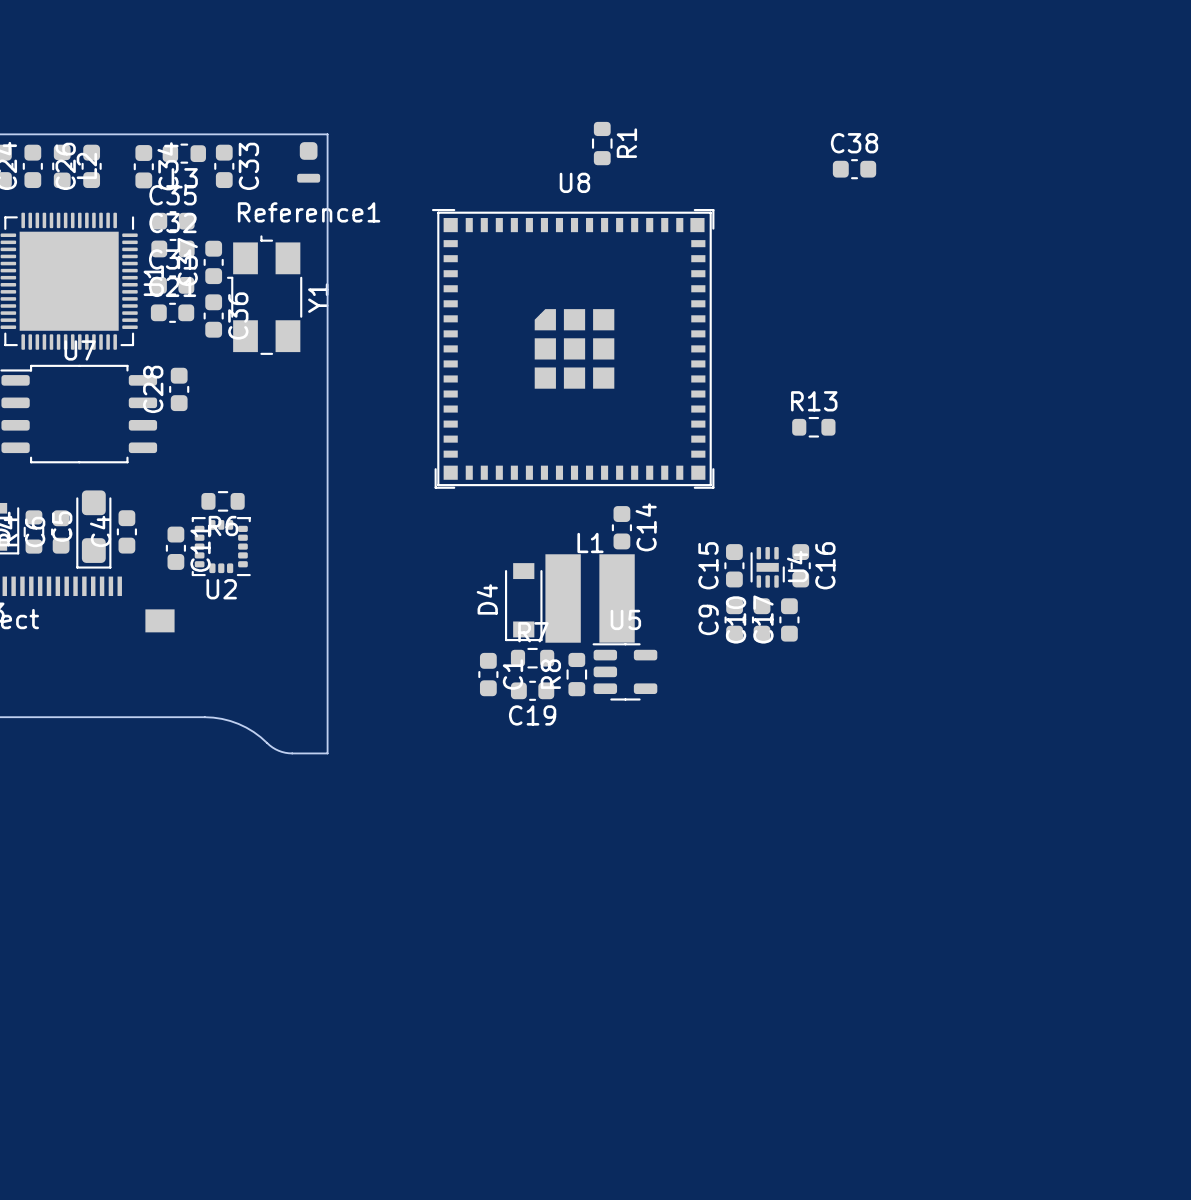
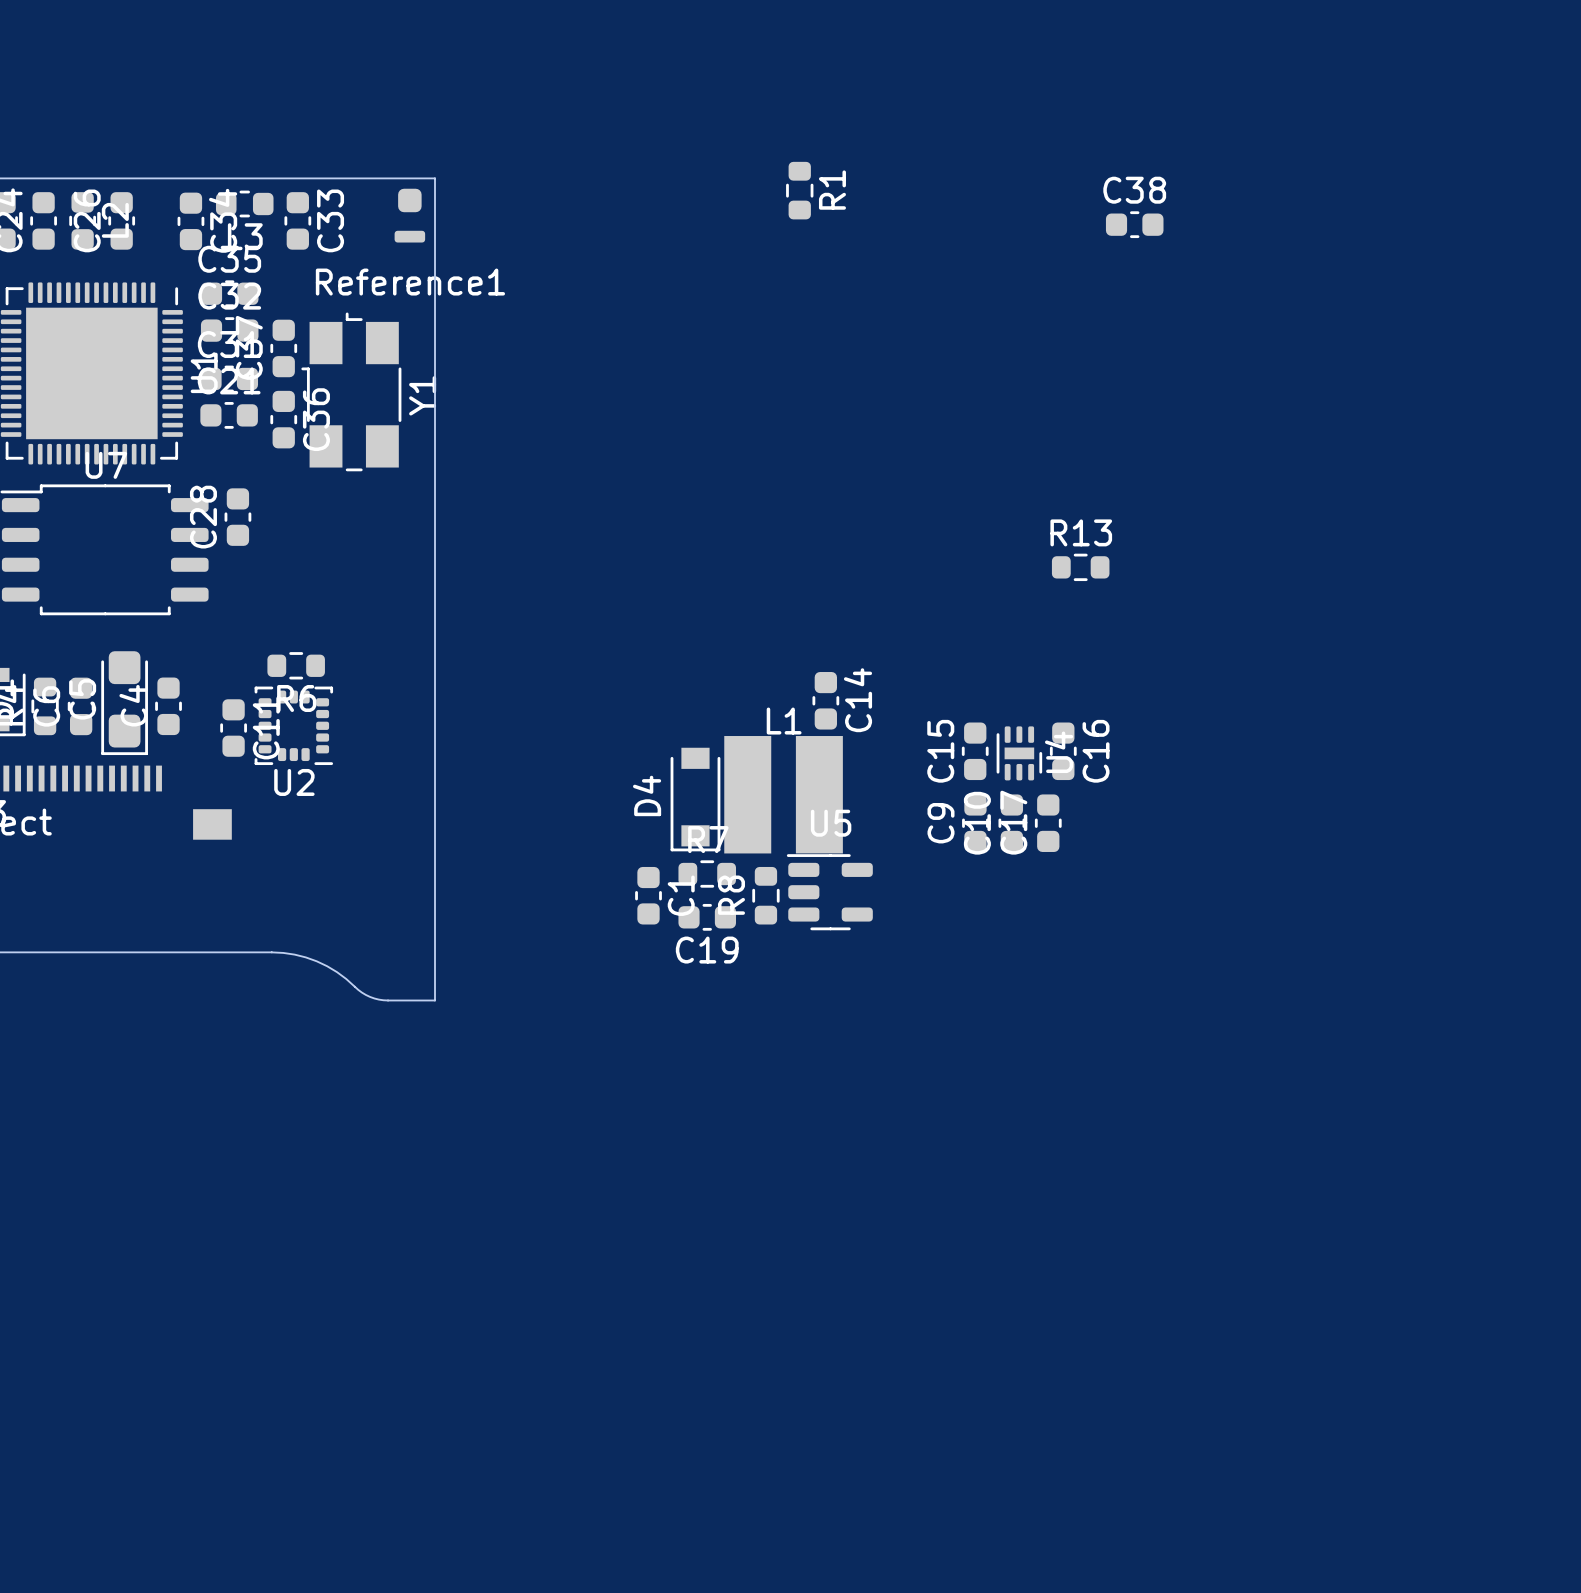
U8: (573, 348) -> none

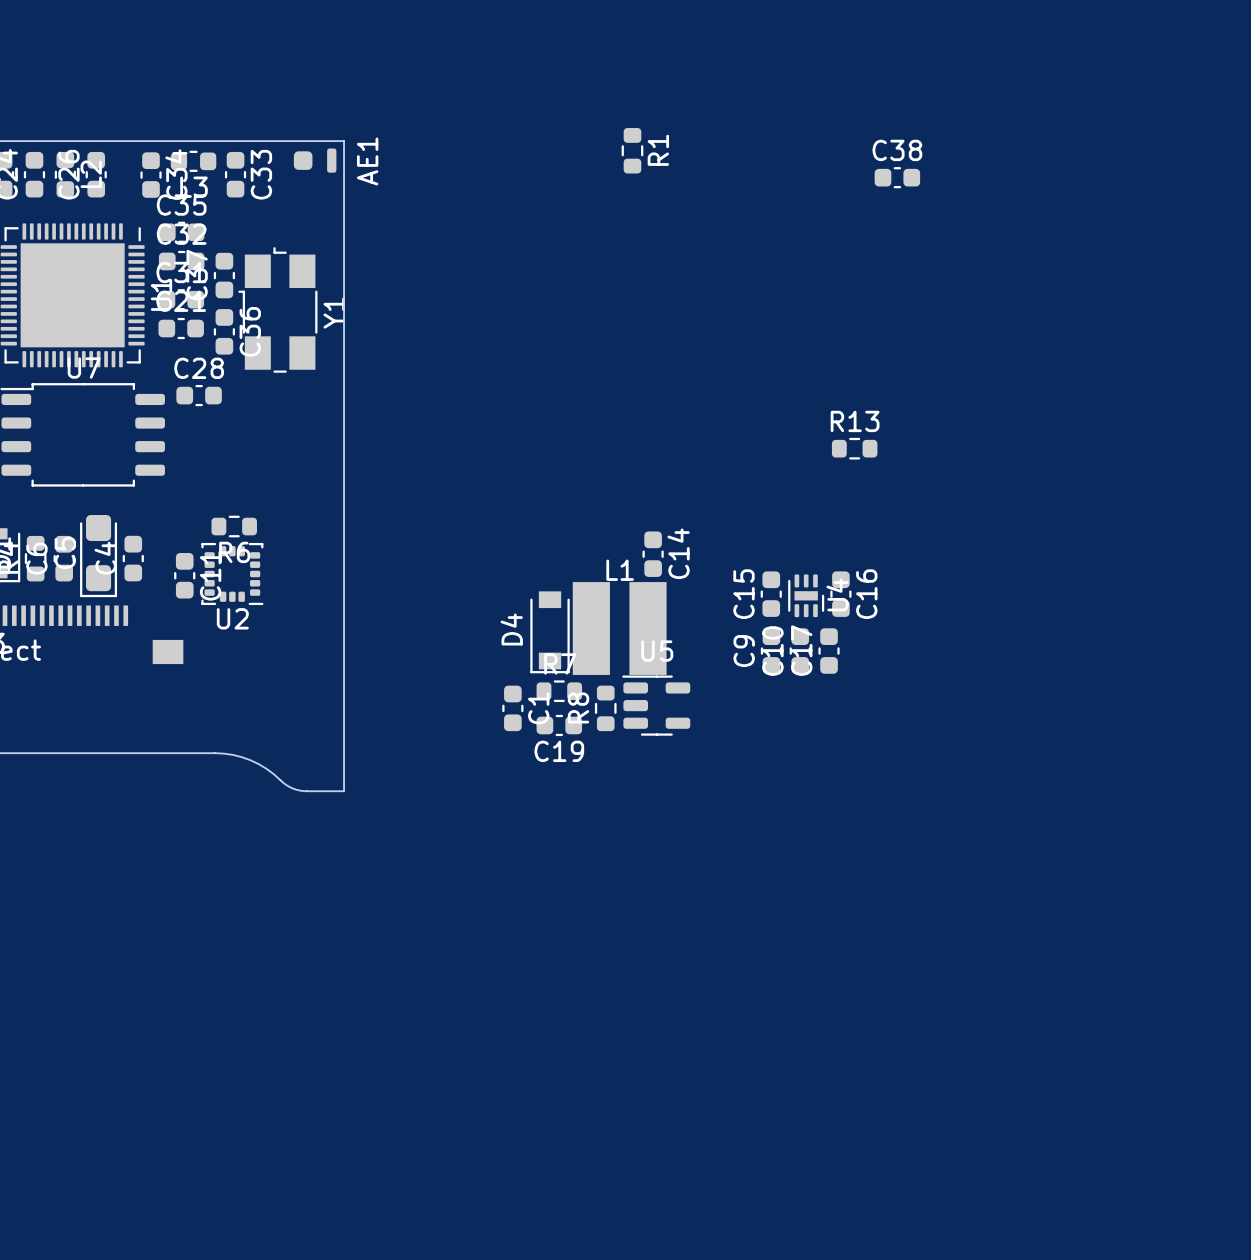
AE1: none -> (315, 160)
Reference1: (409, 215) -> none
C28 rotation: 0° (237, 517) -> 90° clockwise (199, 395)

